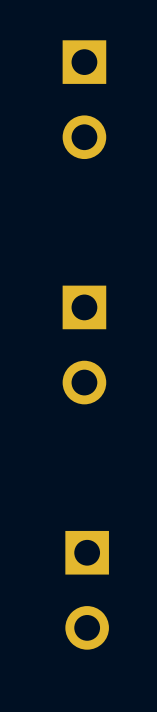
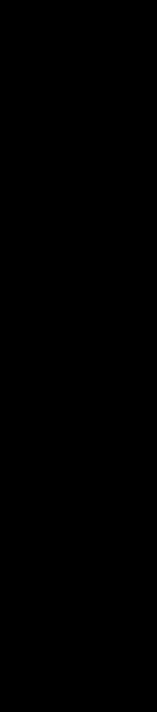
part: (84, 99) -> none
part: (84, 344) -> none
part: (87, 590) -> none

